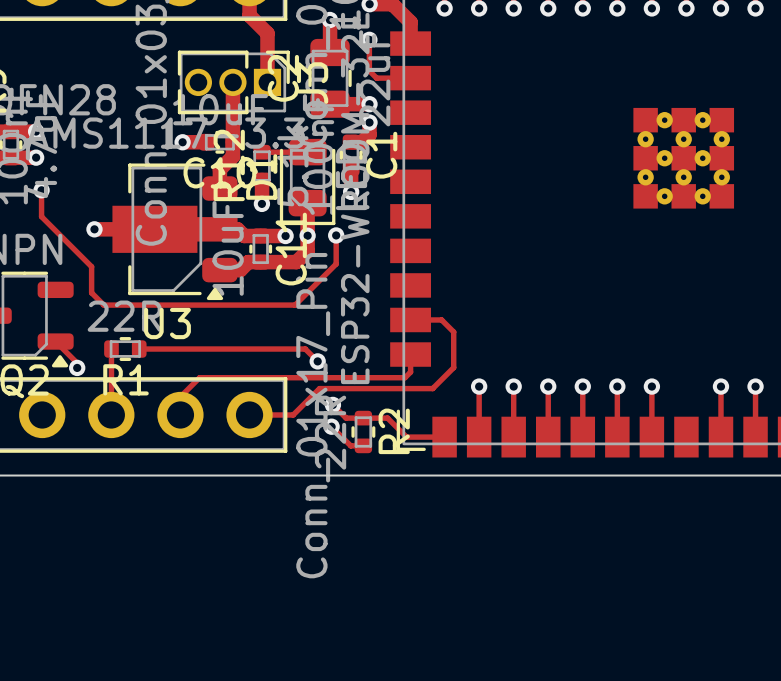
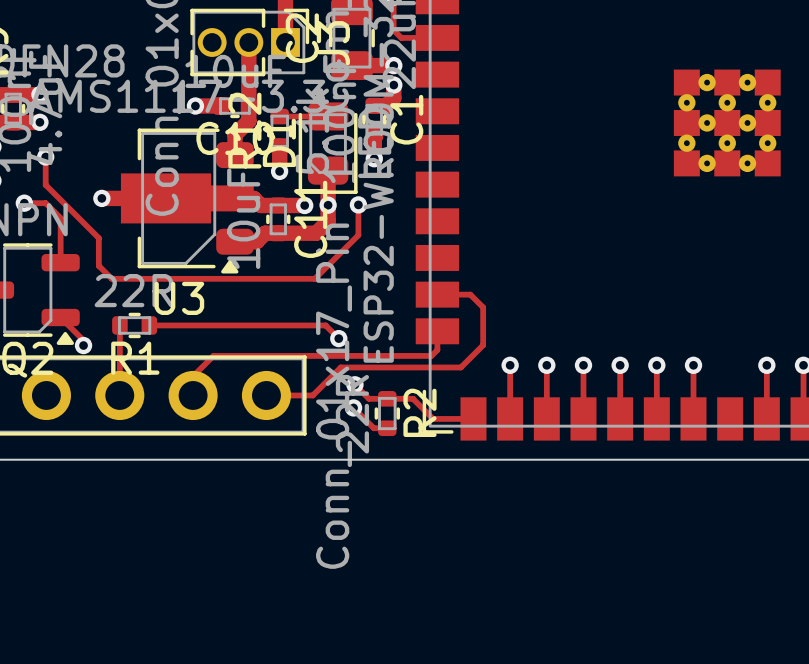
track: none -> (24, 203) (45, 203) (60, 218) (60, 262)
via: none -> (24, 203)

